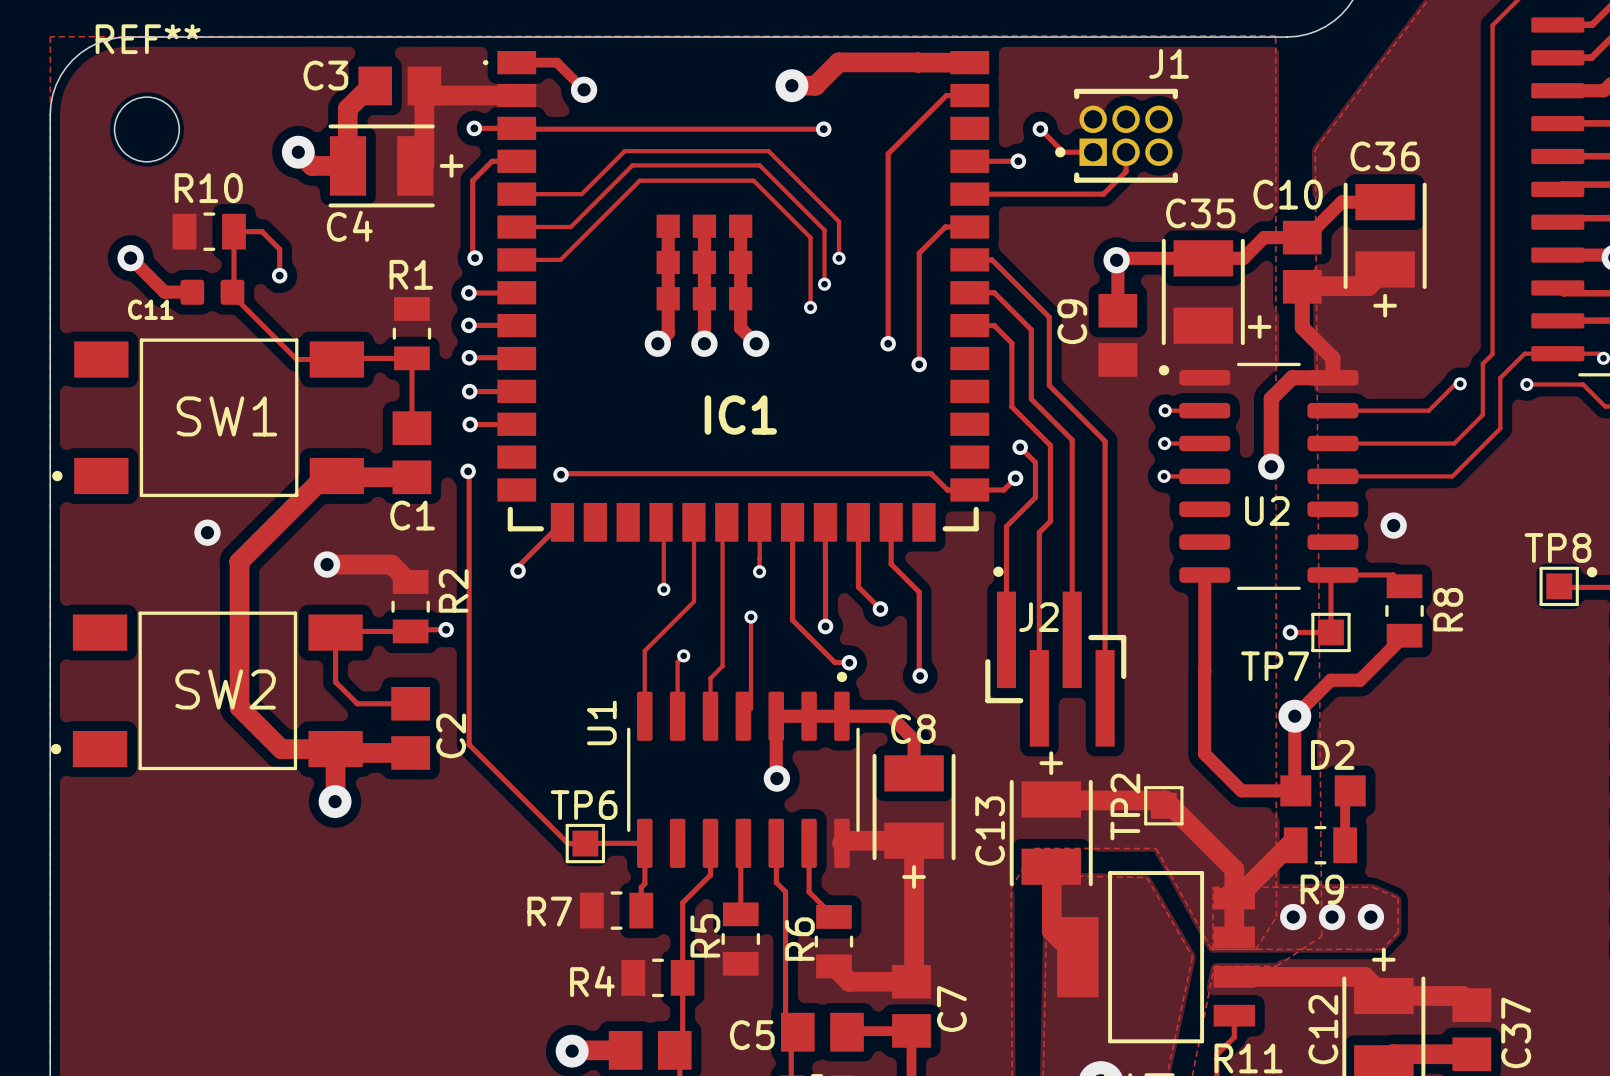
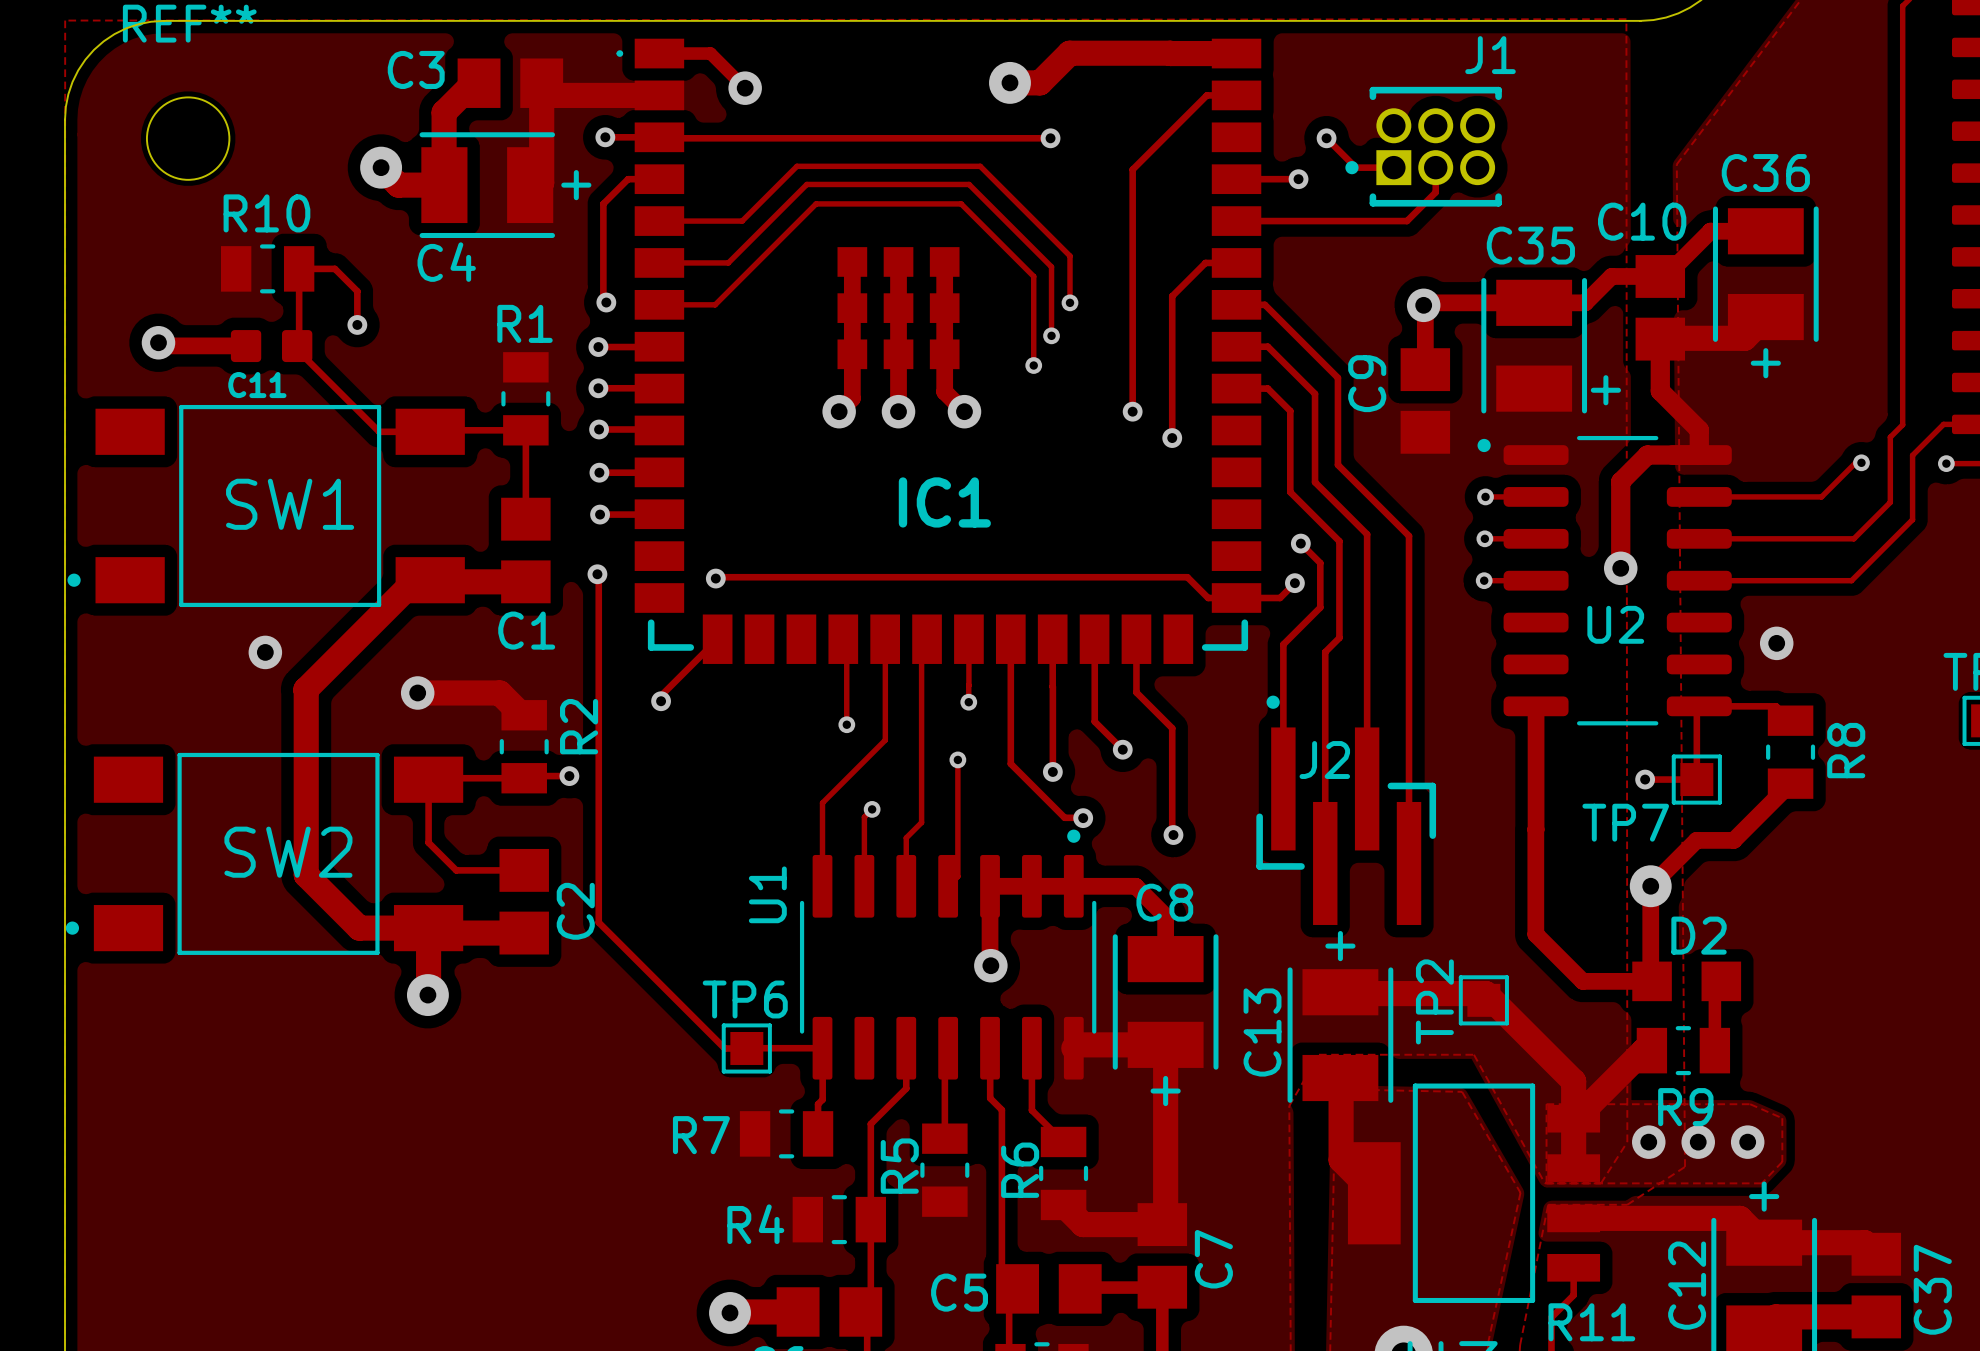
track: (130, 258) (164, 292) -> (158, 342) (161, 345) (210, 345)
via position: (130, 258) -> (158, 342)
C11 name position: C11 (150, 309) -> C11 (257, 385)

